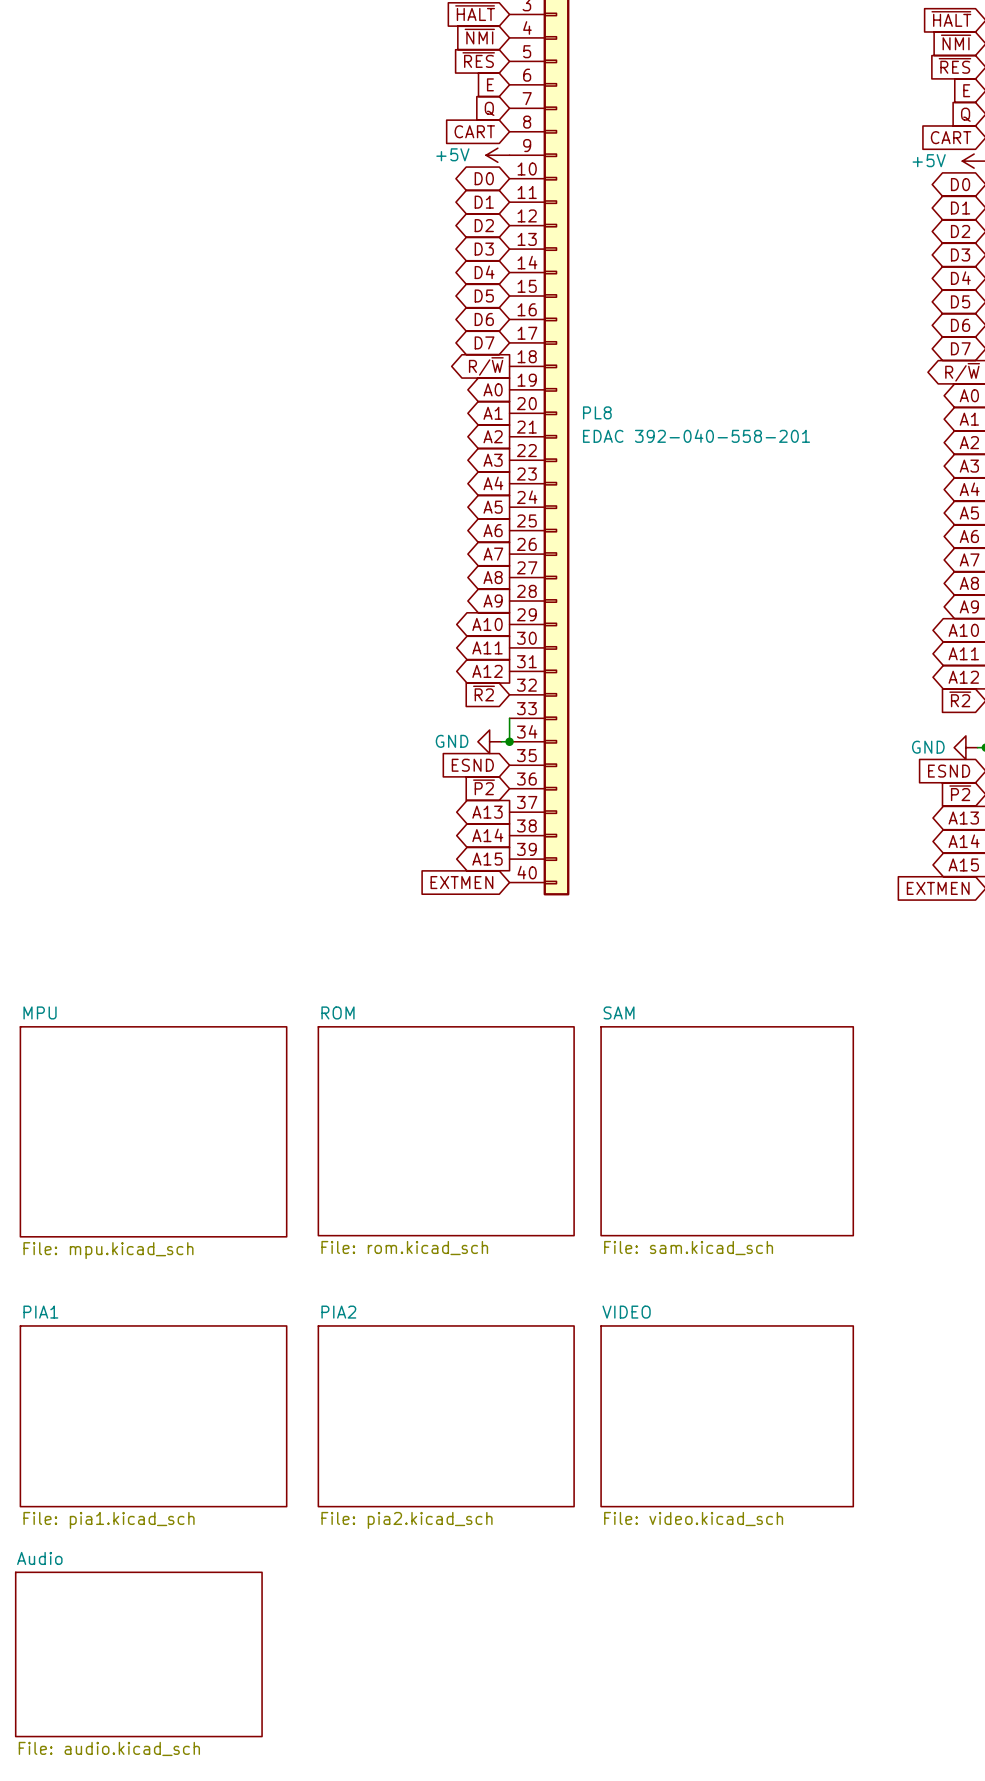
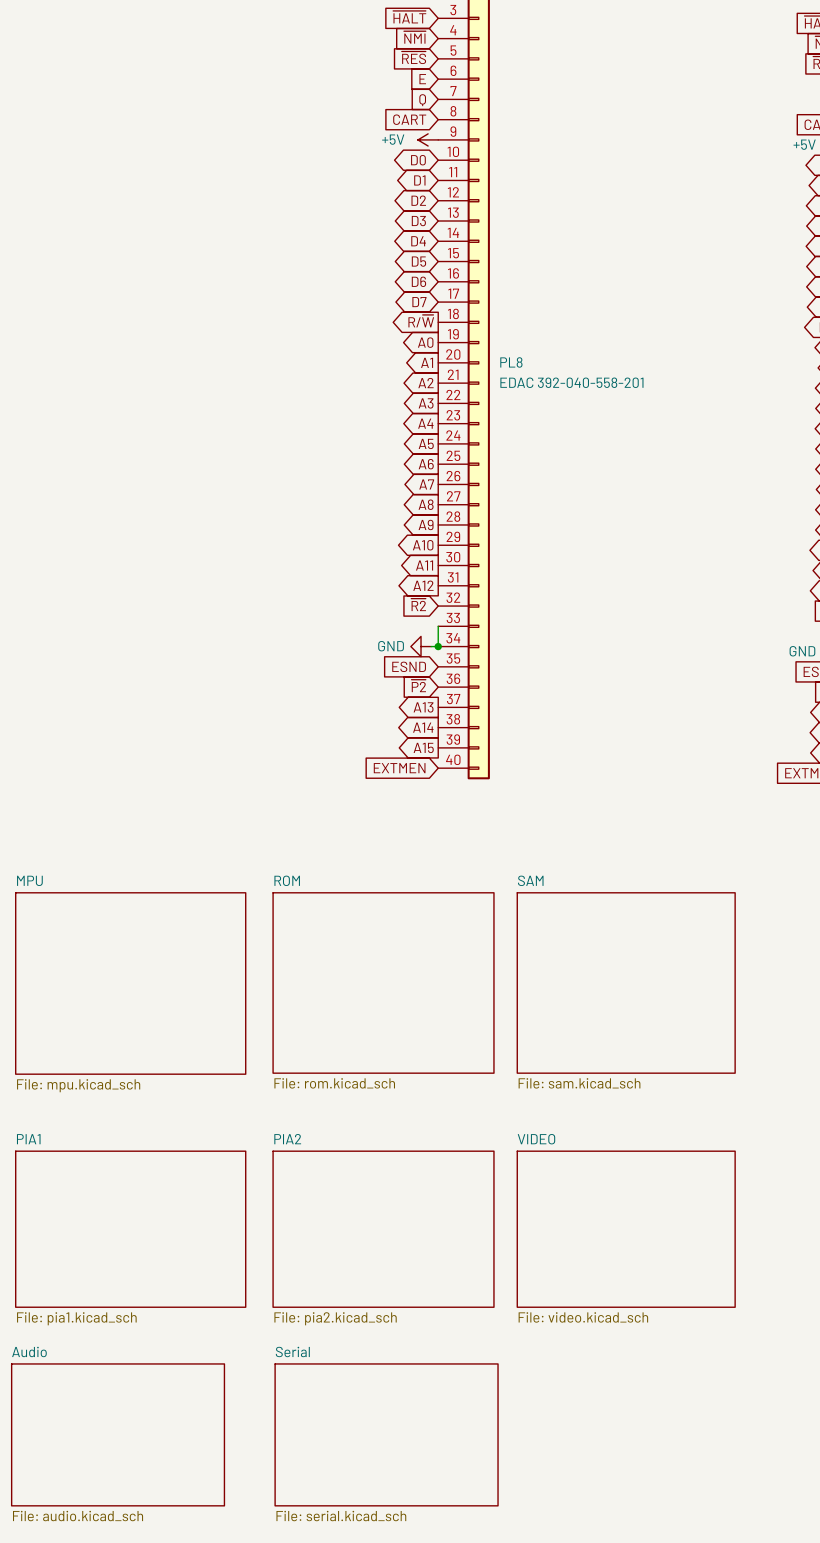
sheet Serial: none -> File: serial.kicad_sch (386, 1434)

